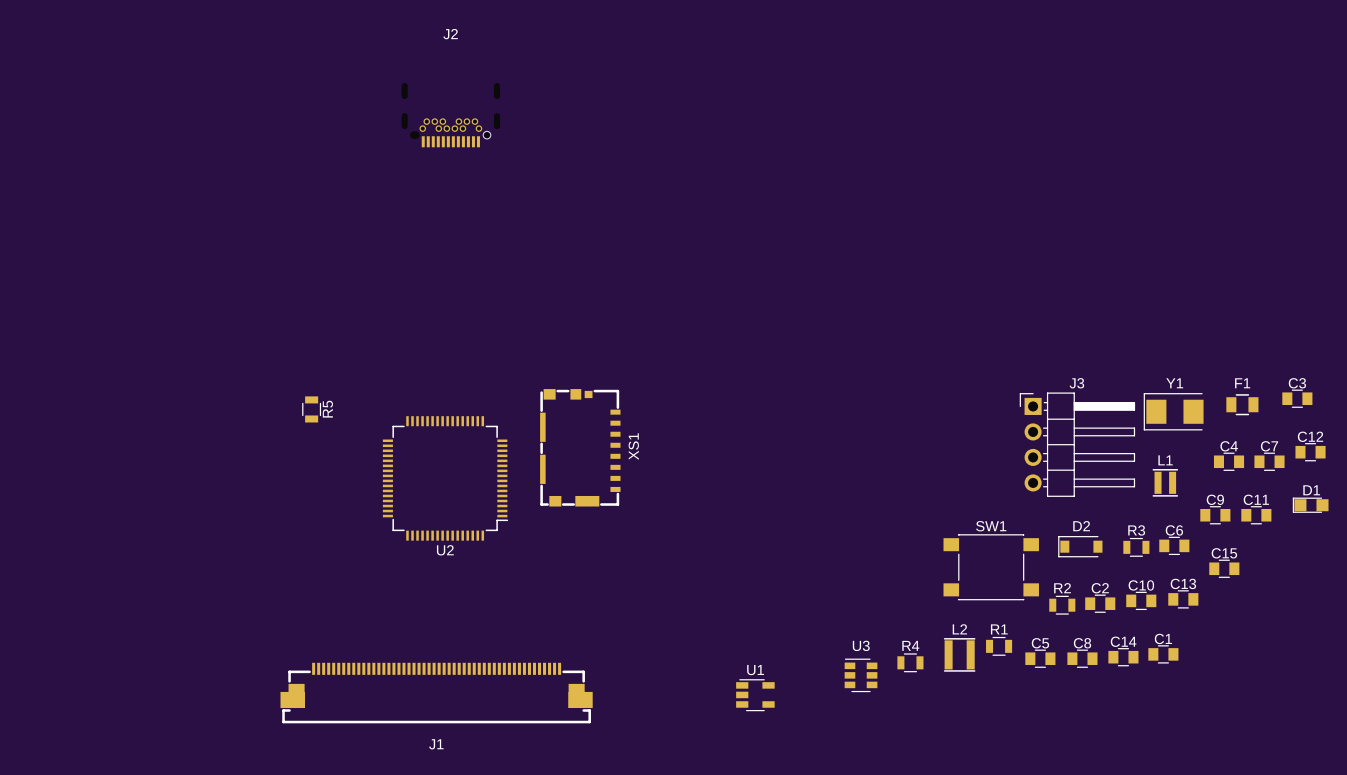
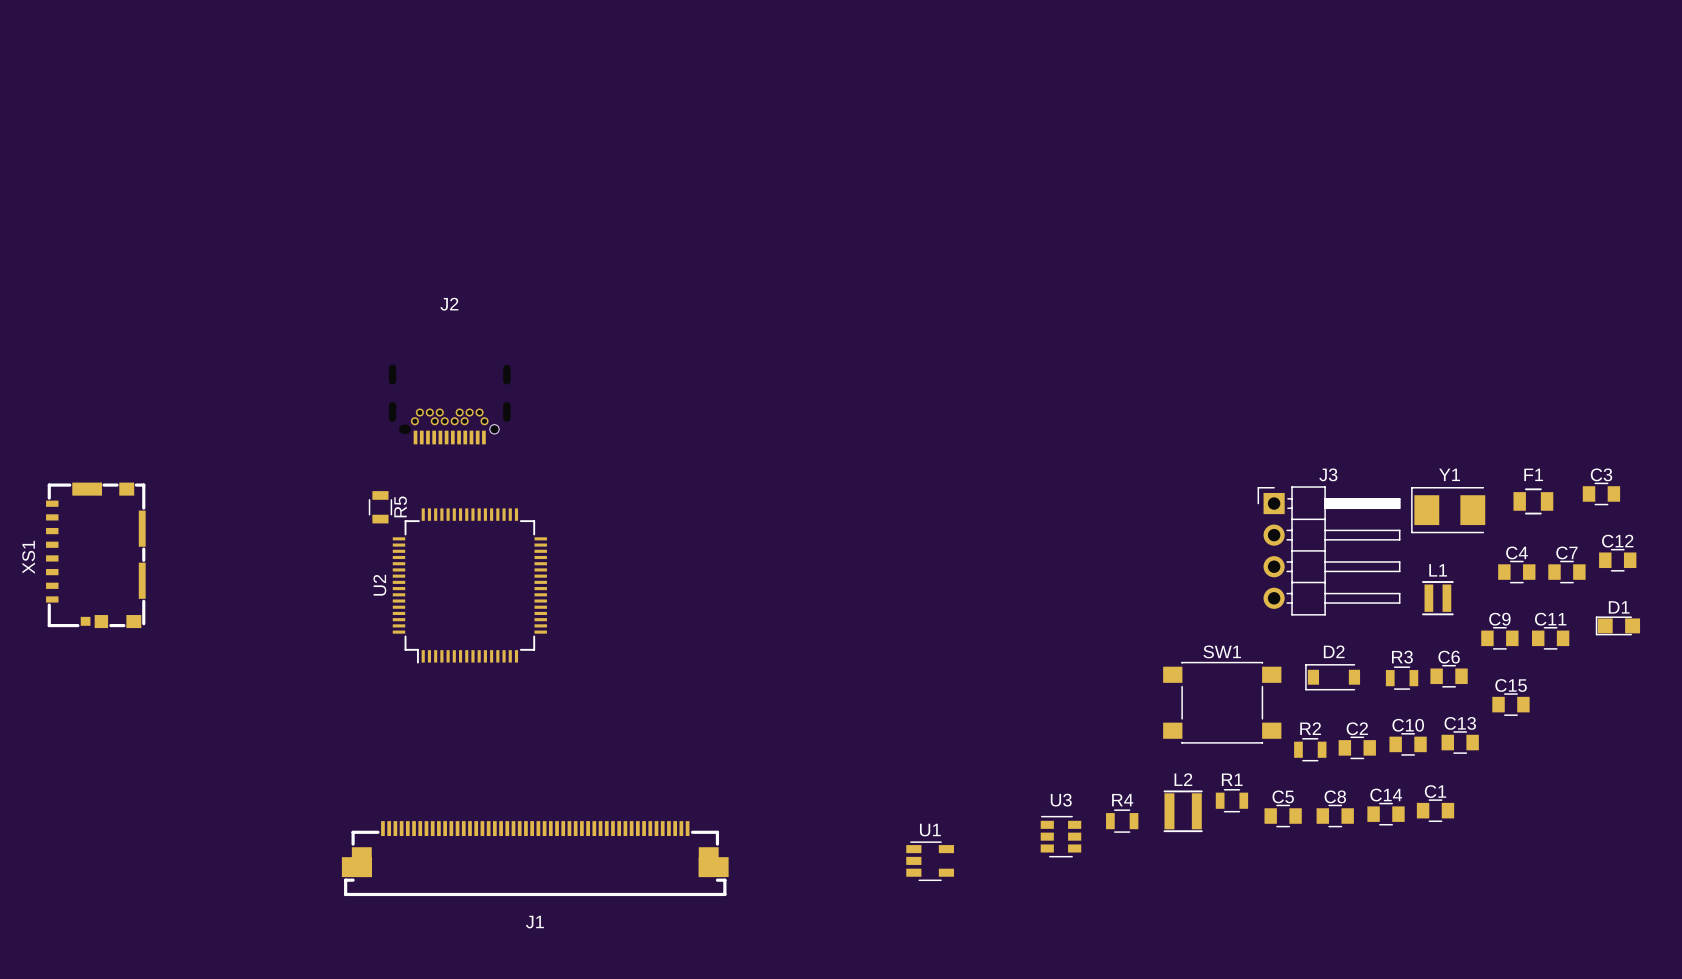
J2 position: (450, 115) -> (449, 404)
XS1 rotation: 0° (580, 447) -> 180° (95, 555)
XS1 position: (580, 447) -> (95, 555)
U2 rotation: 0° (445, 478) -> 90° clockwise (469, 585)

